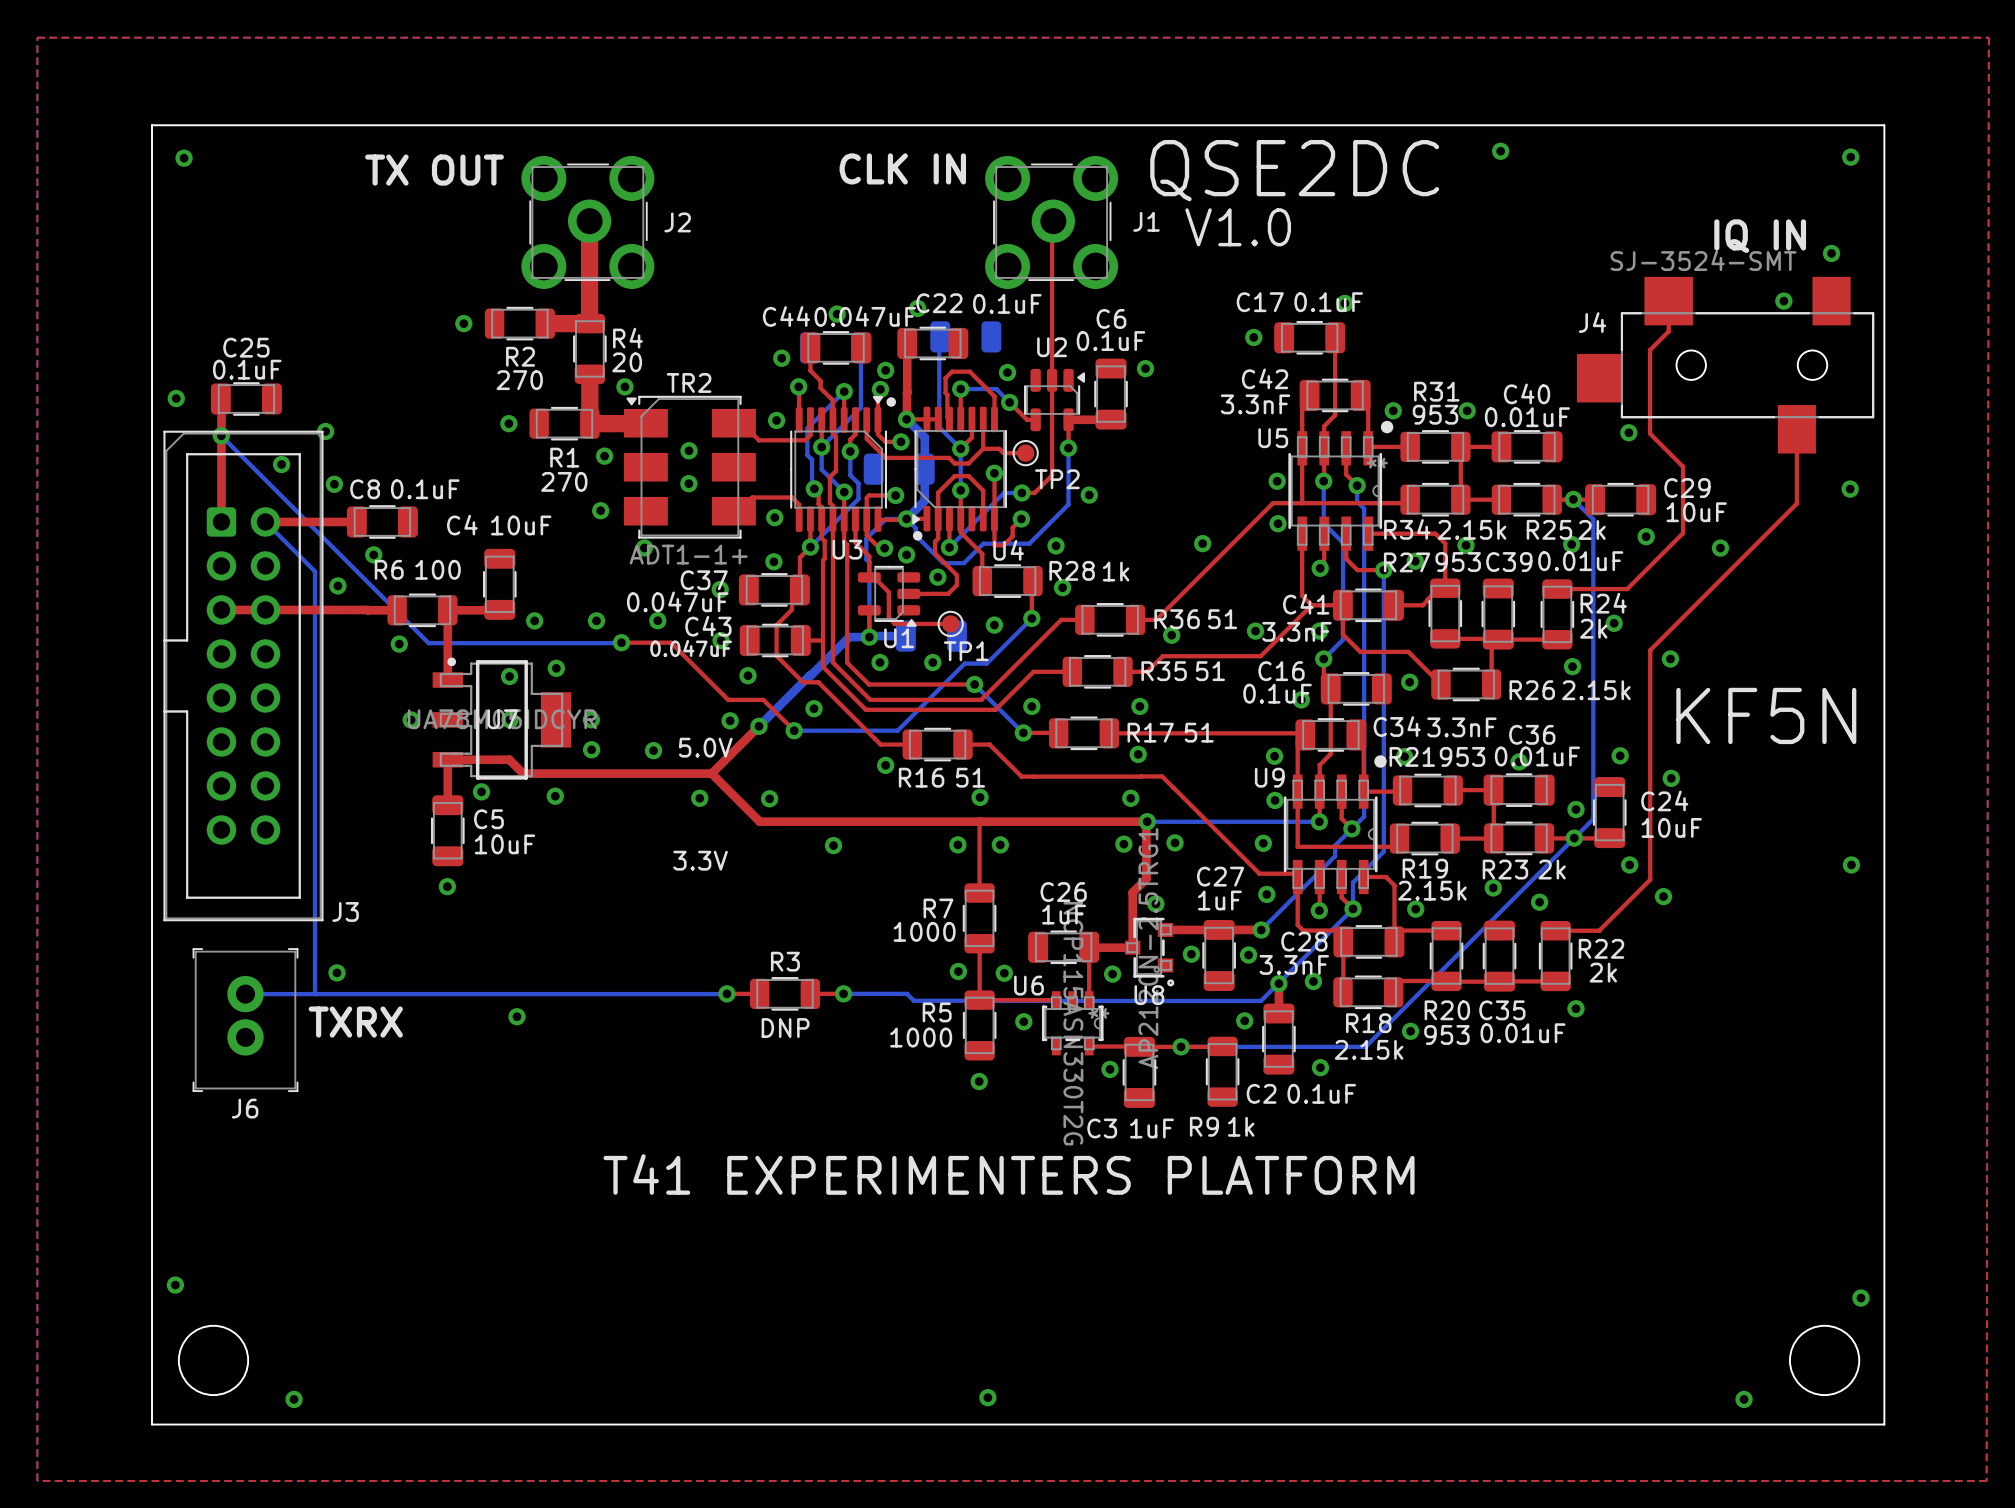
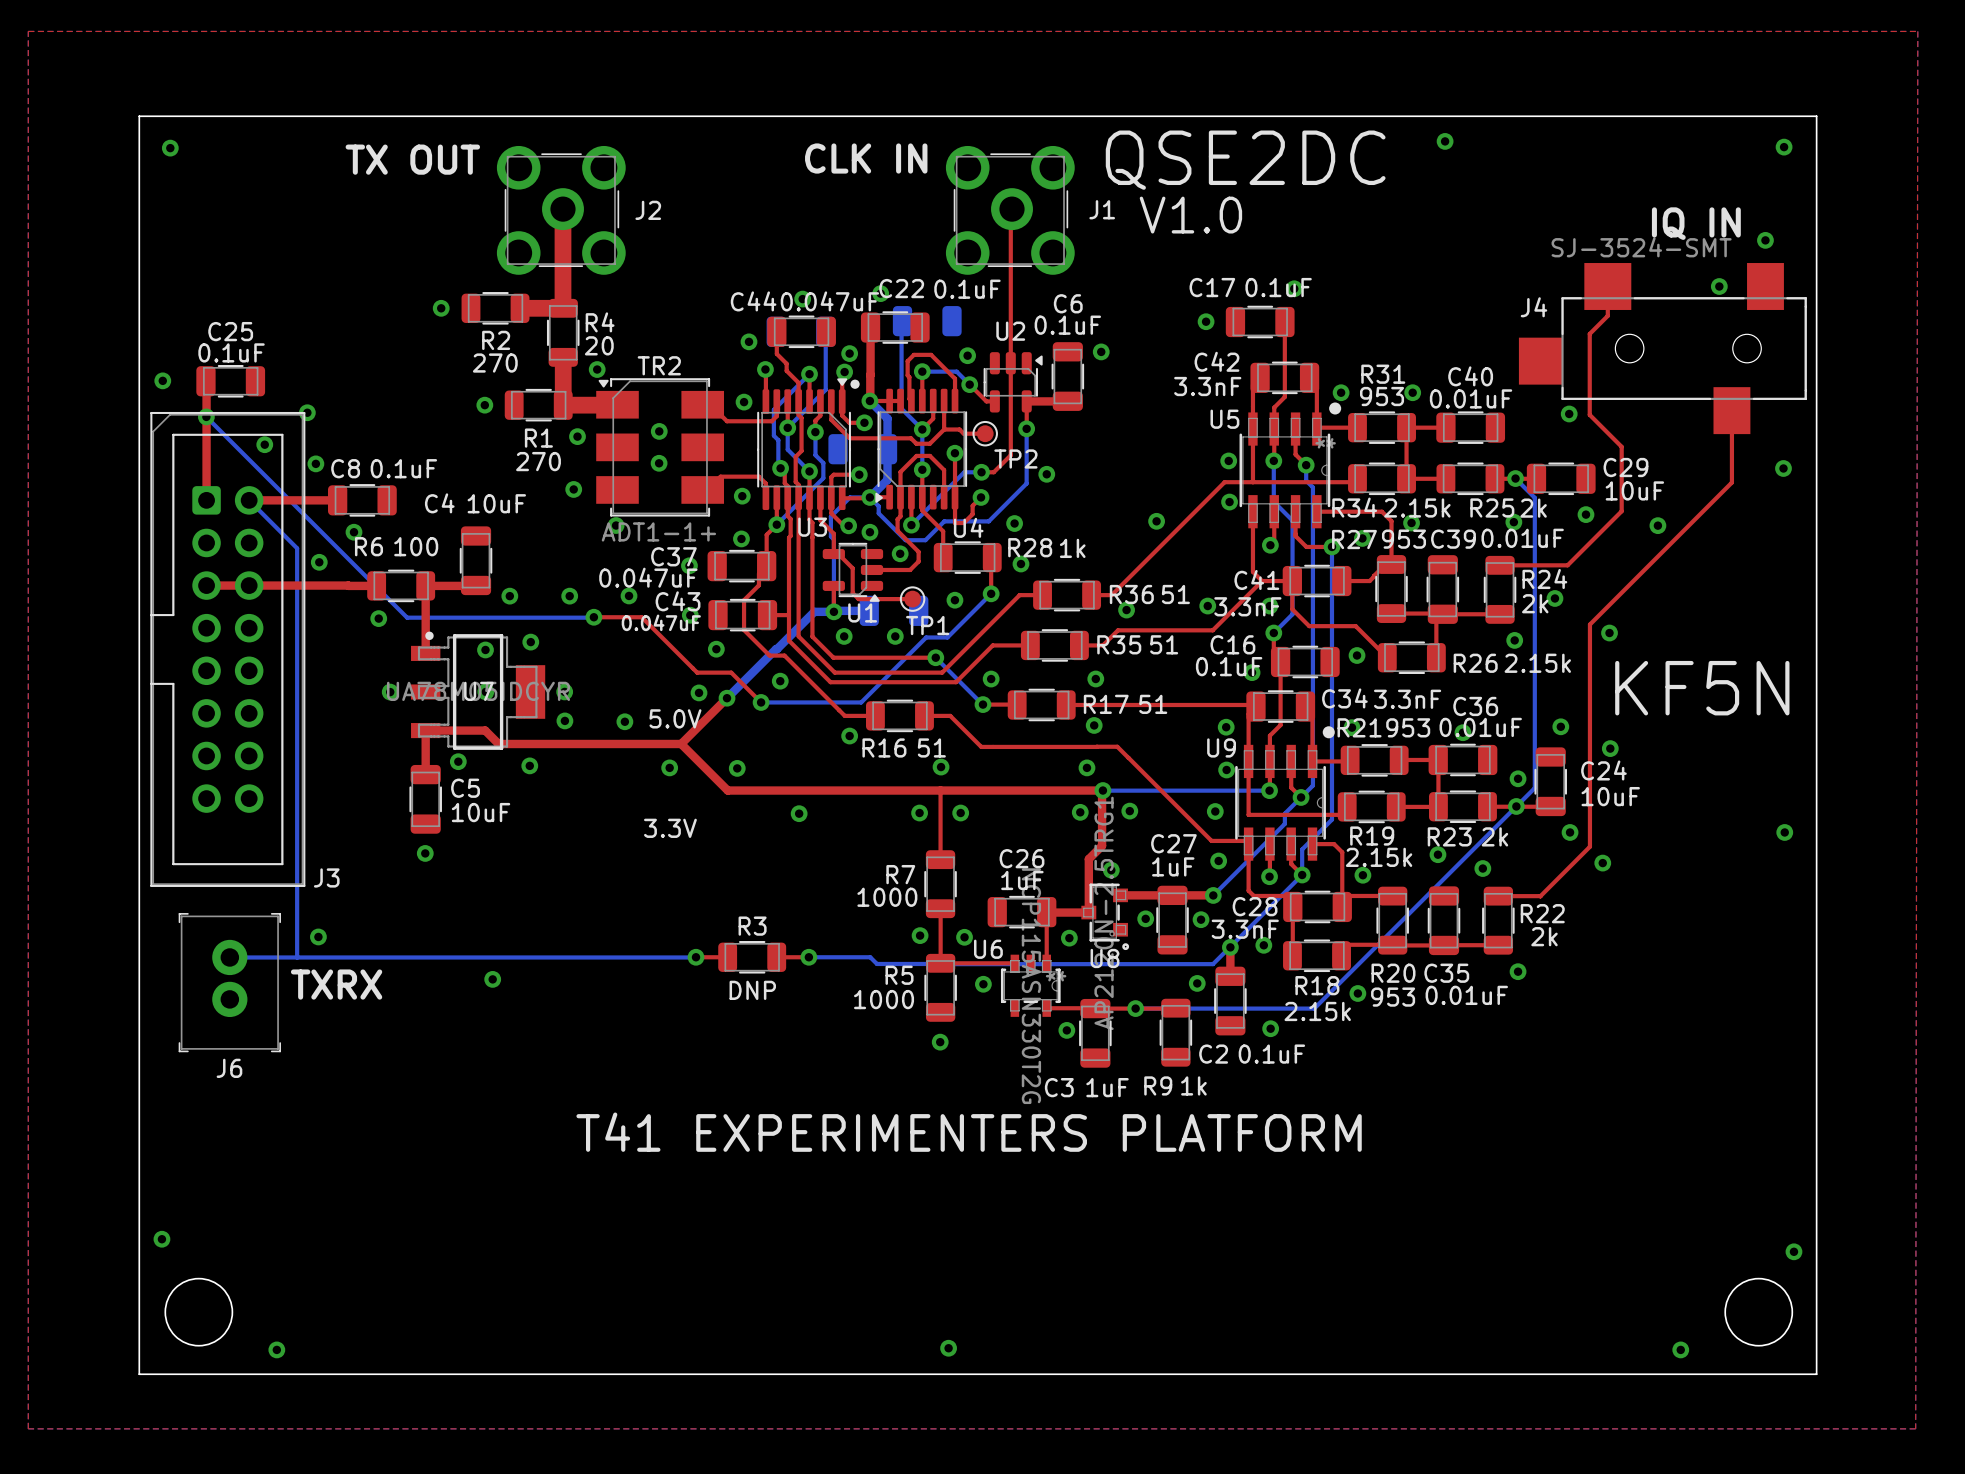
drawing: [912, 531, 923, 541] -> none

